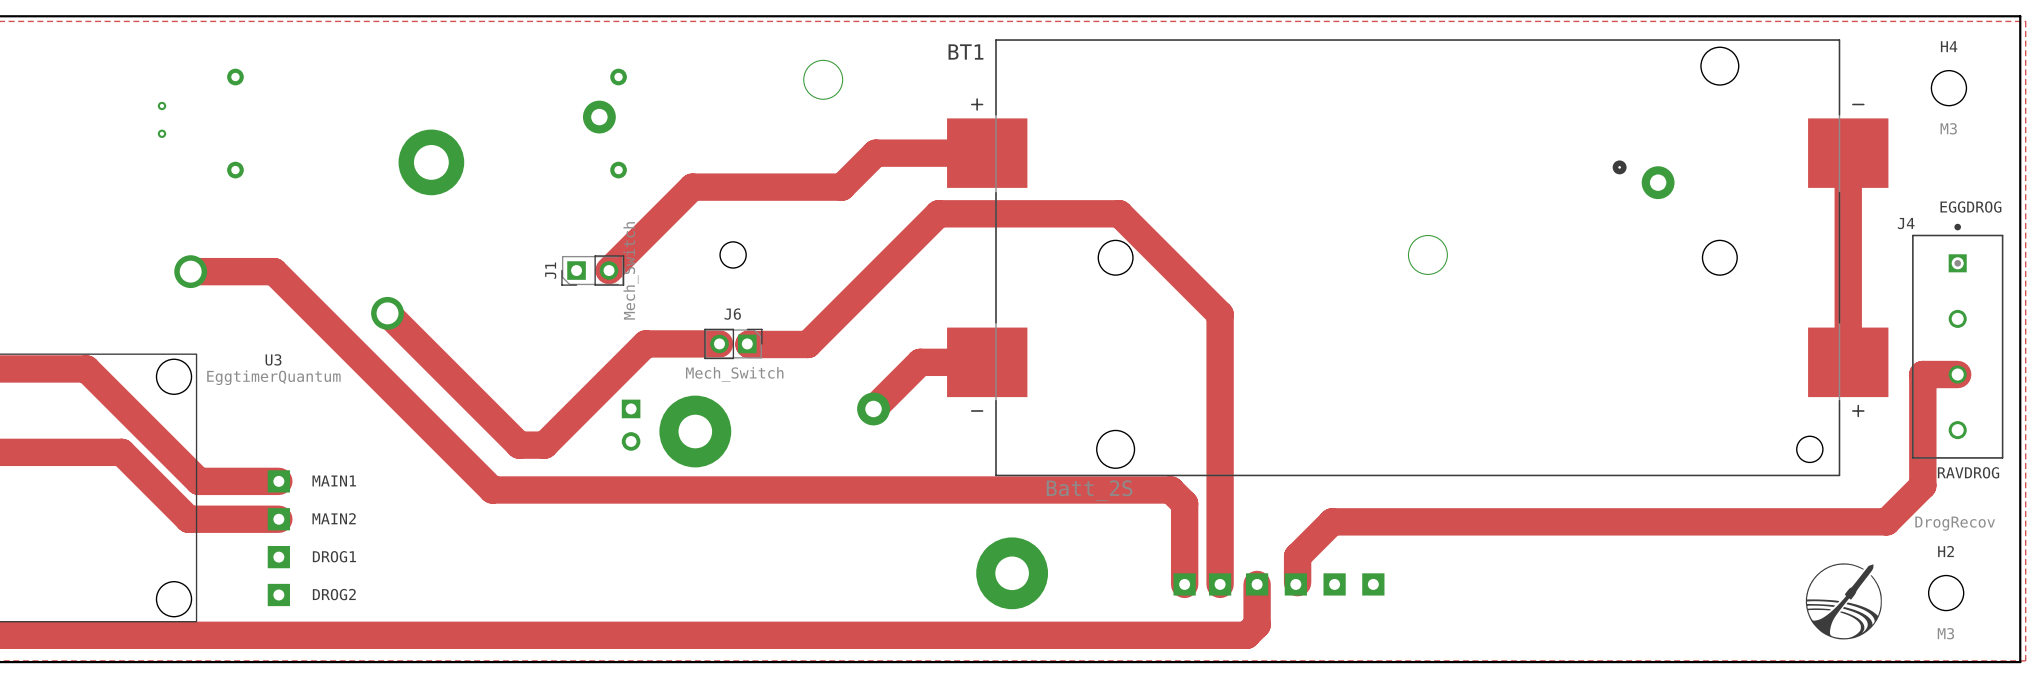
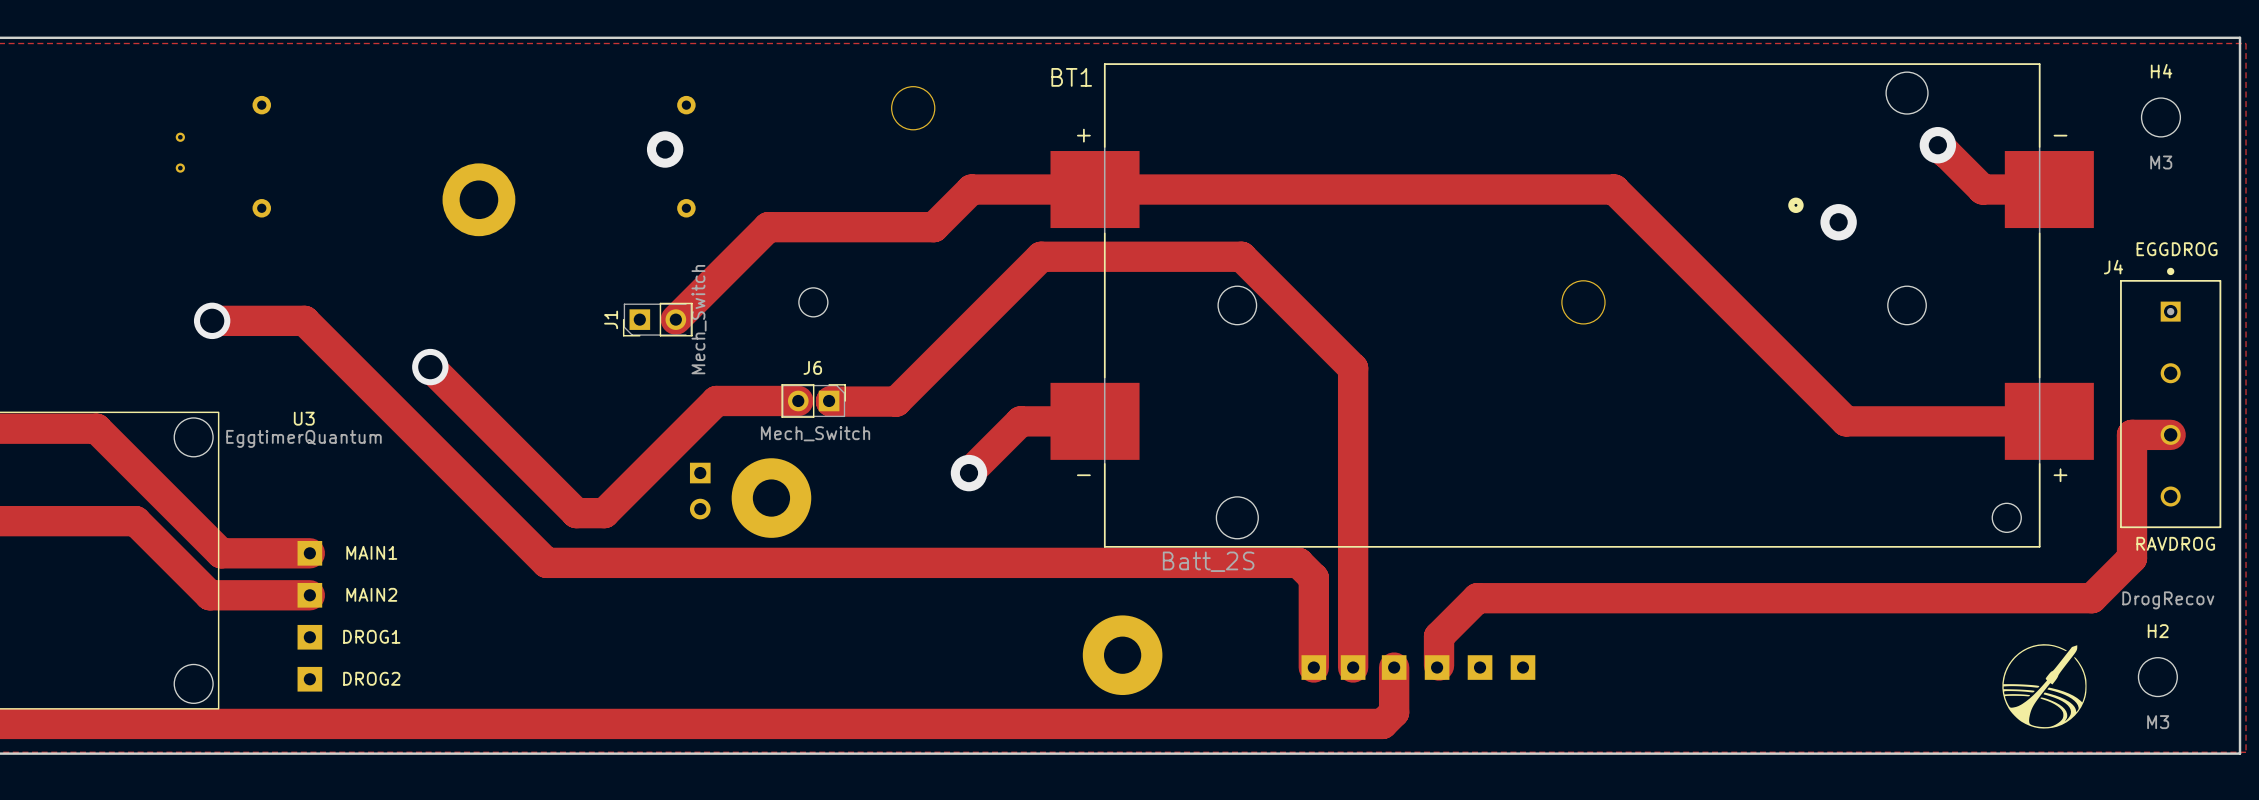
via: none -> (1937, 145)
track: none -> (1095, 189) (1614, 189) (1846, 421) (2049, 421)
track: (1848, 153) (1848, 362) -> (2049, 189) (1982, 189) (1937, 145)

